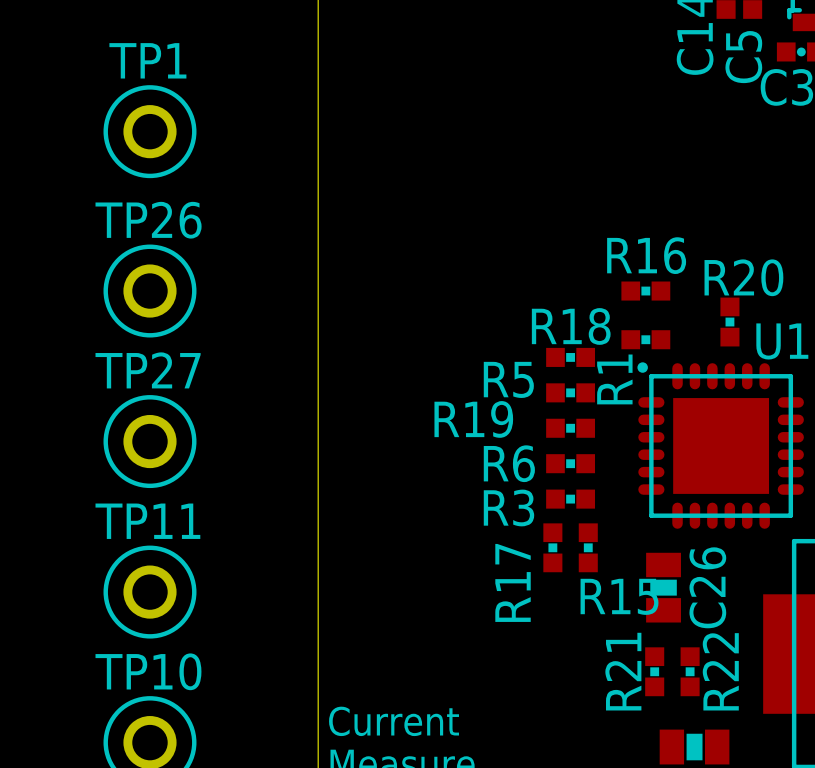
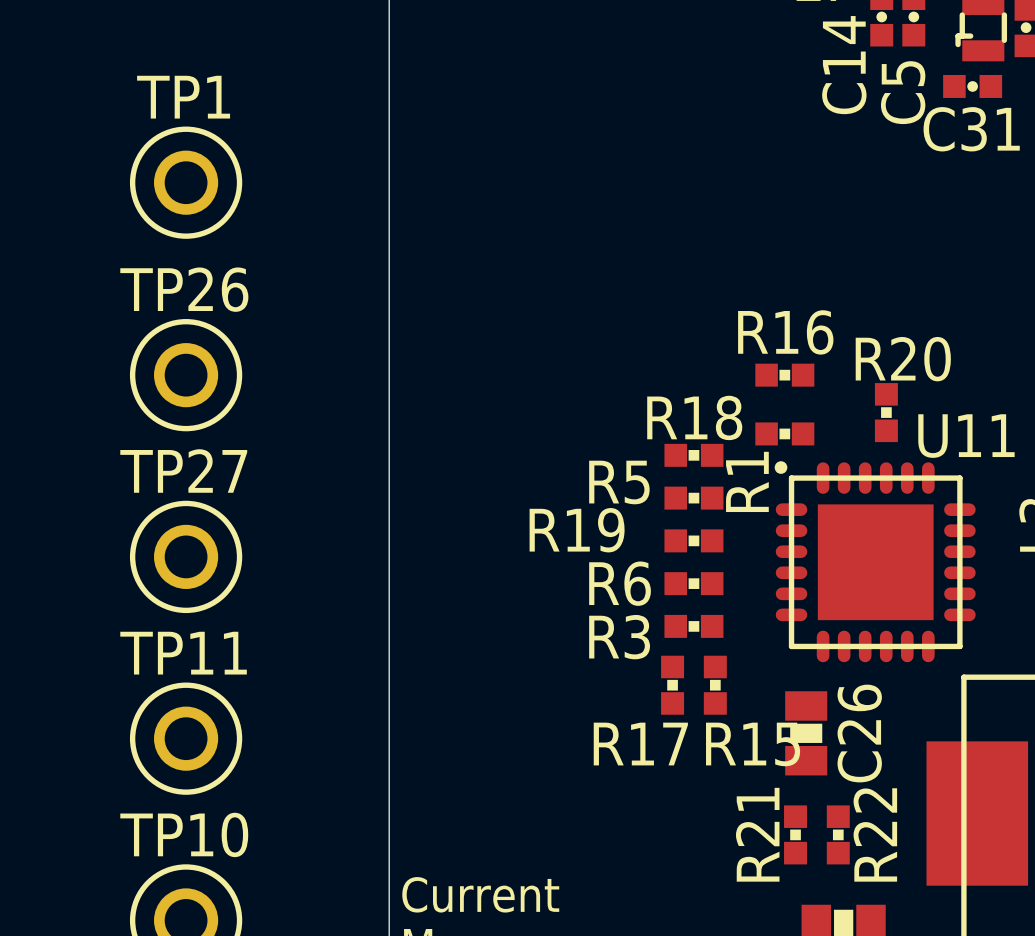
R17 name rotation: 0° (513, 582) -> 90° clockwise (640, 744)

